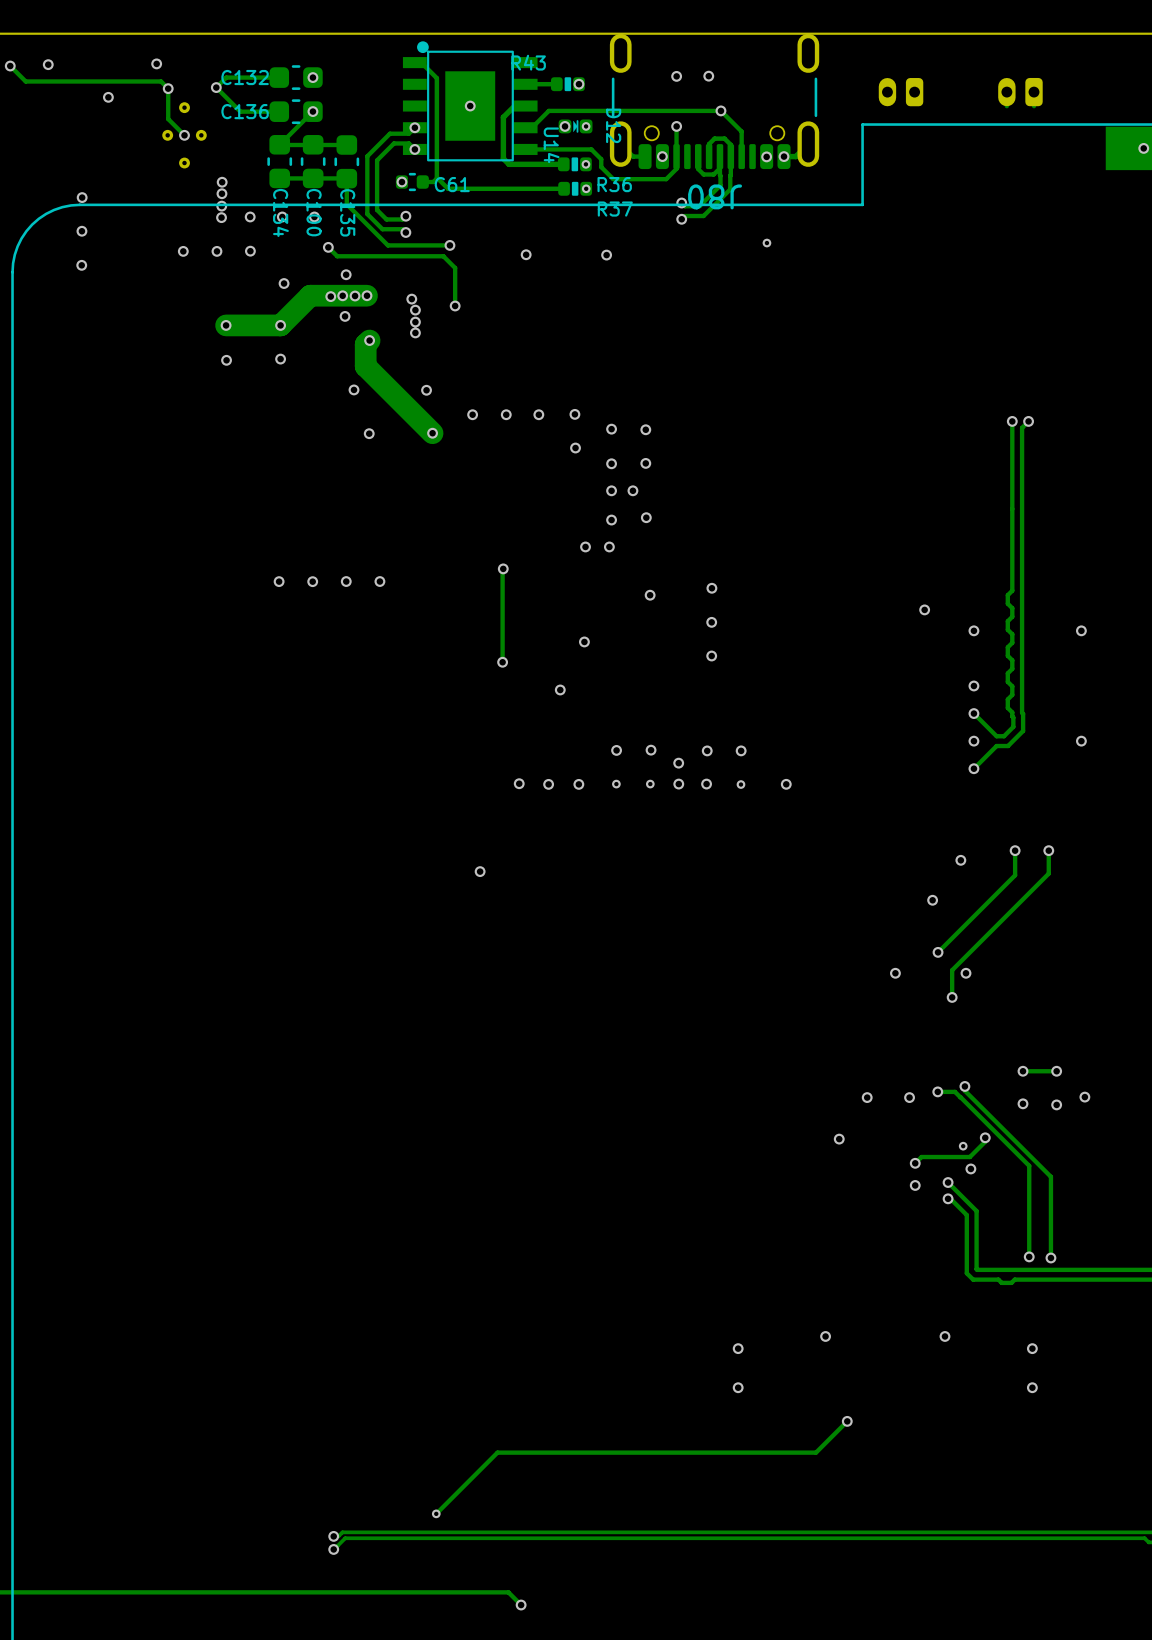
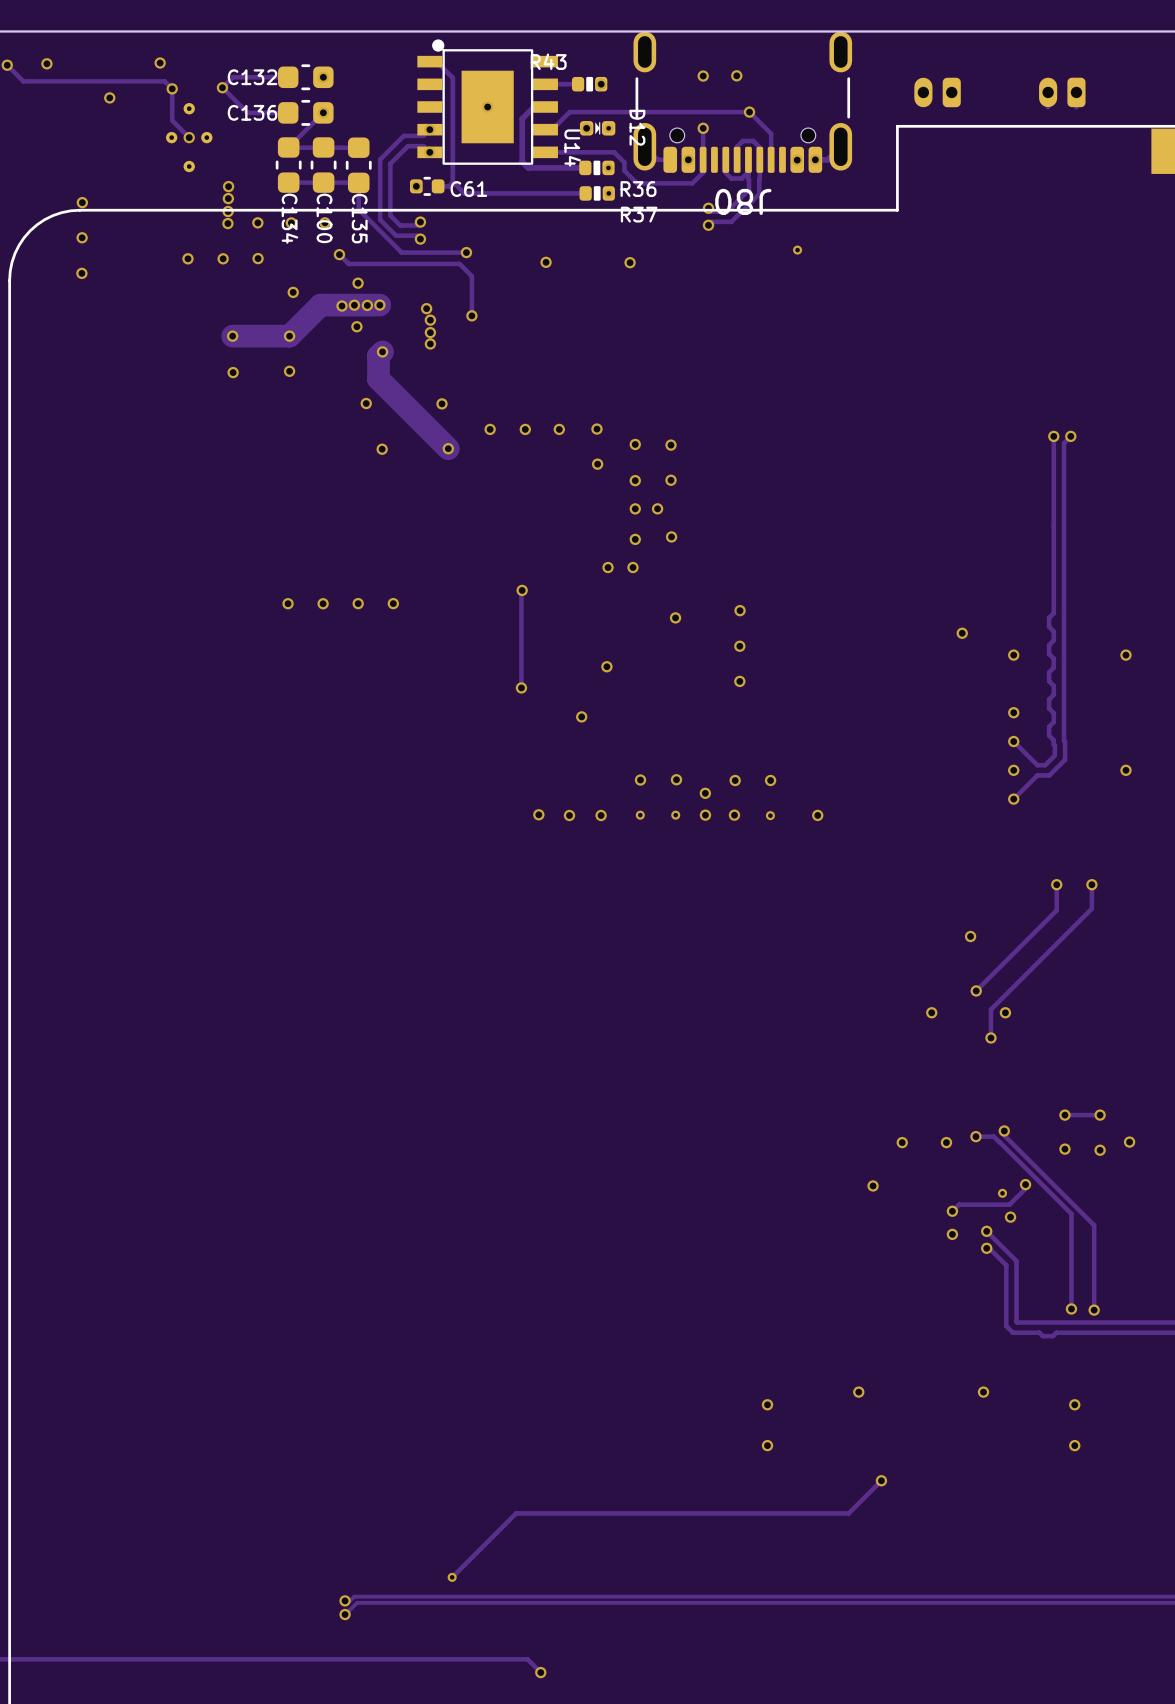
via: (960, 860) -> none
via: (480, 871) -> none

